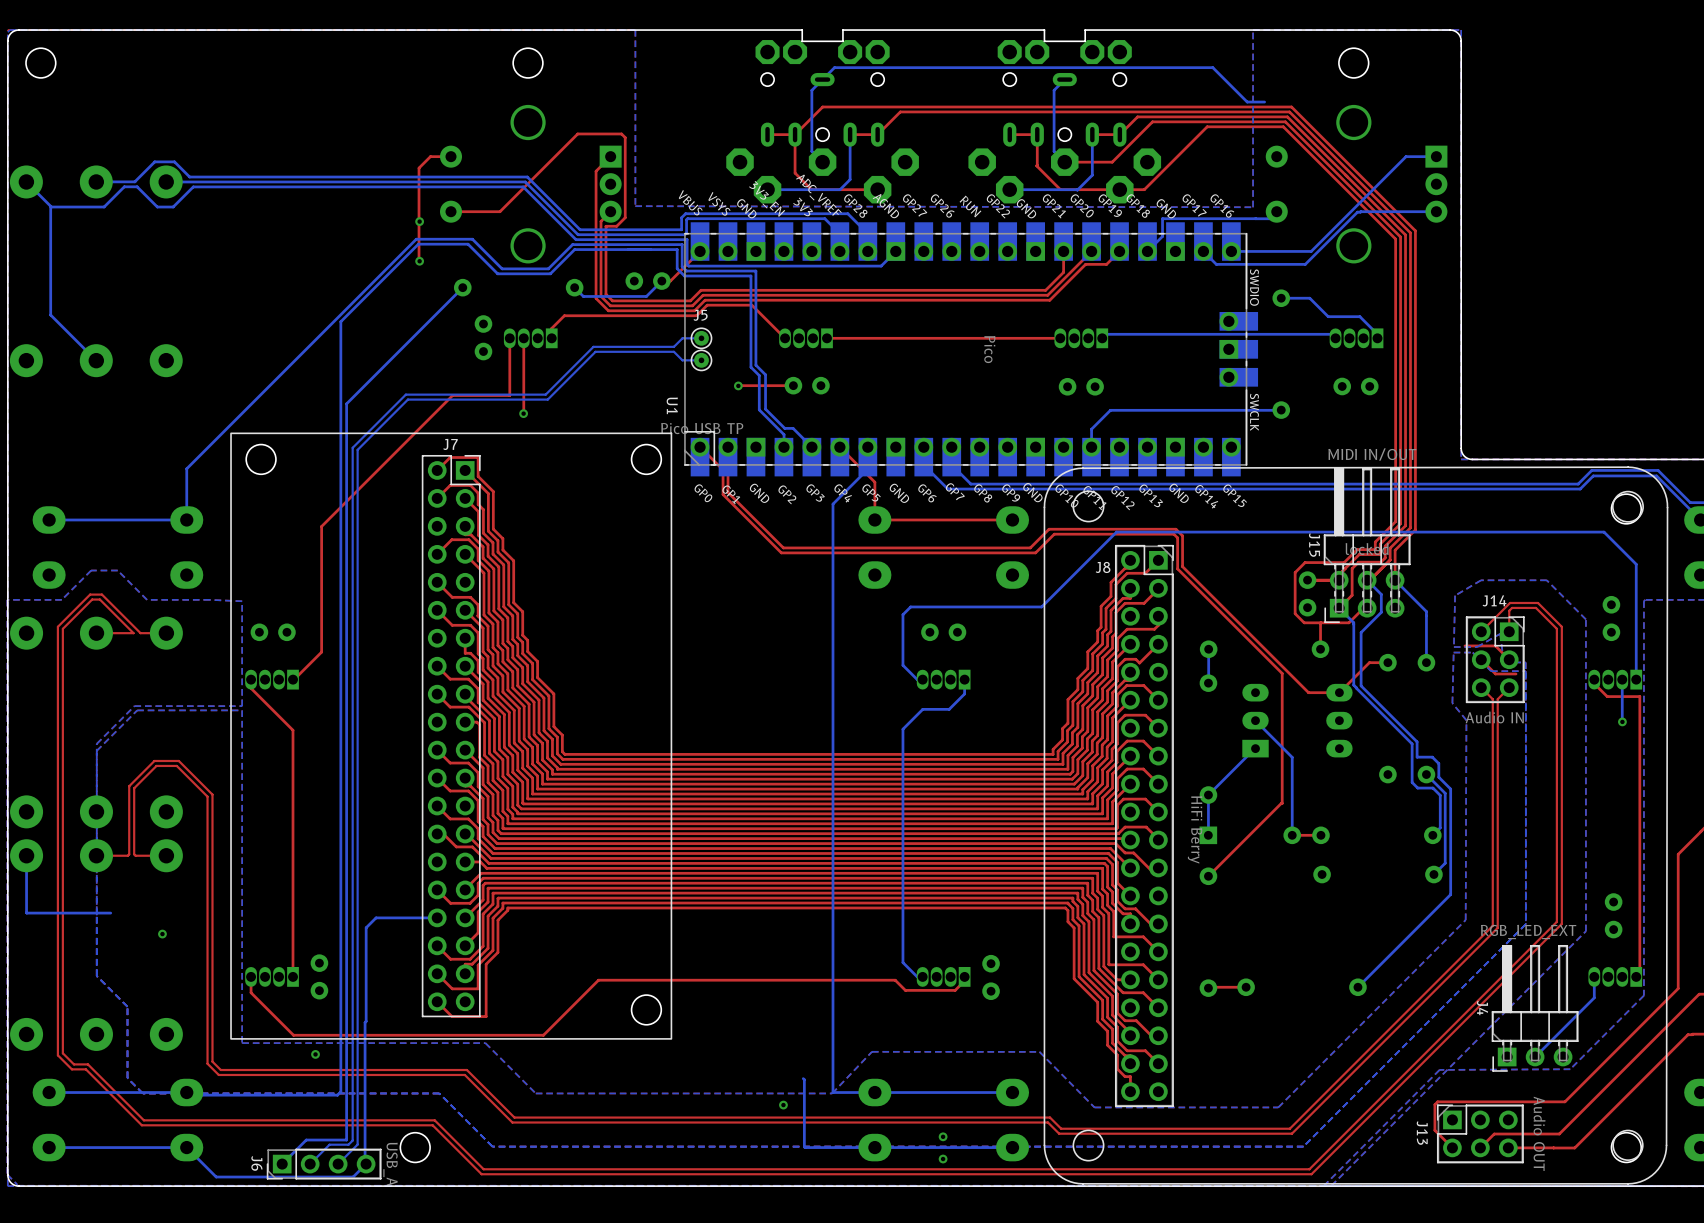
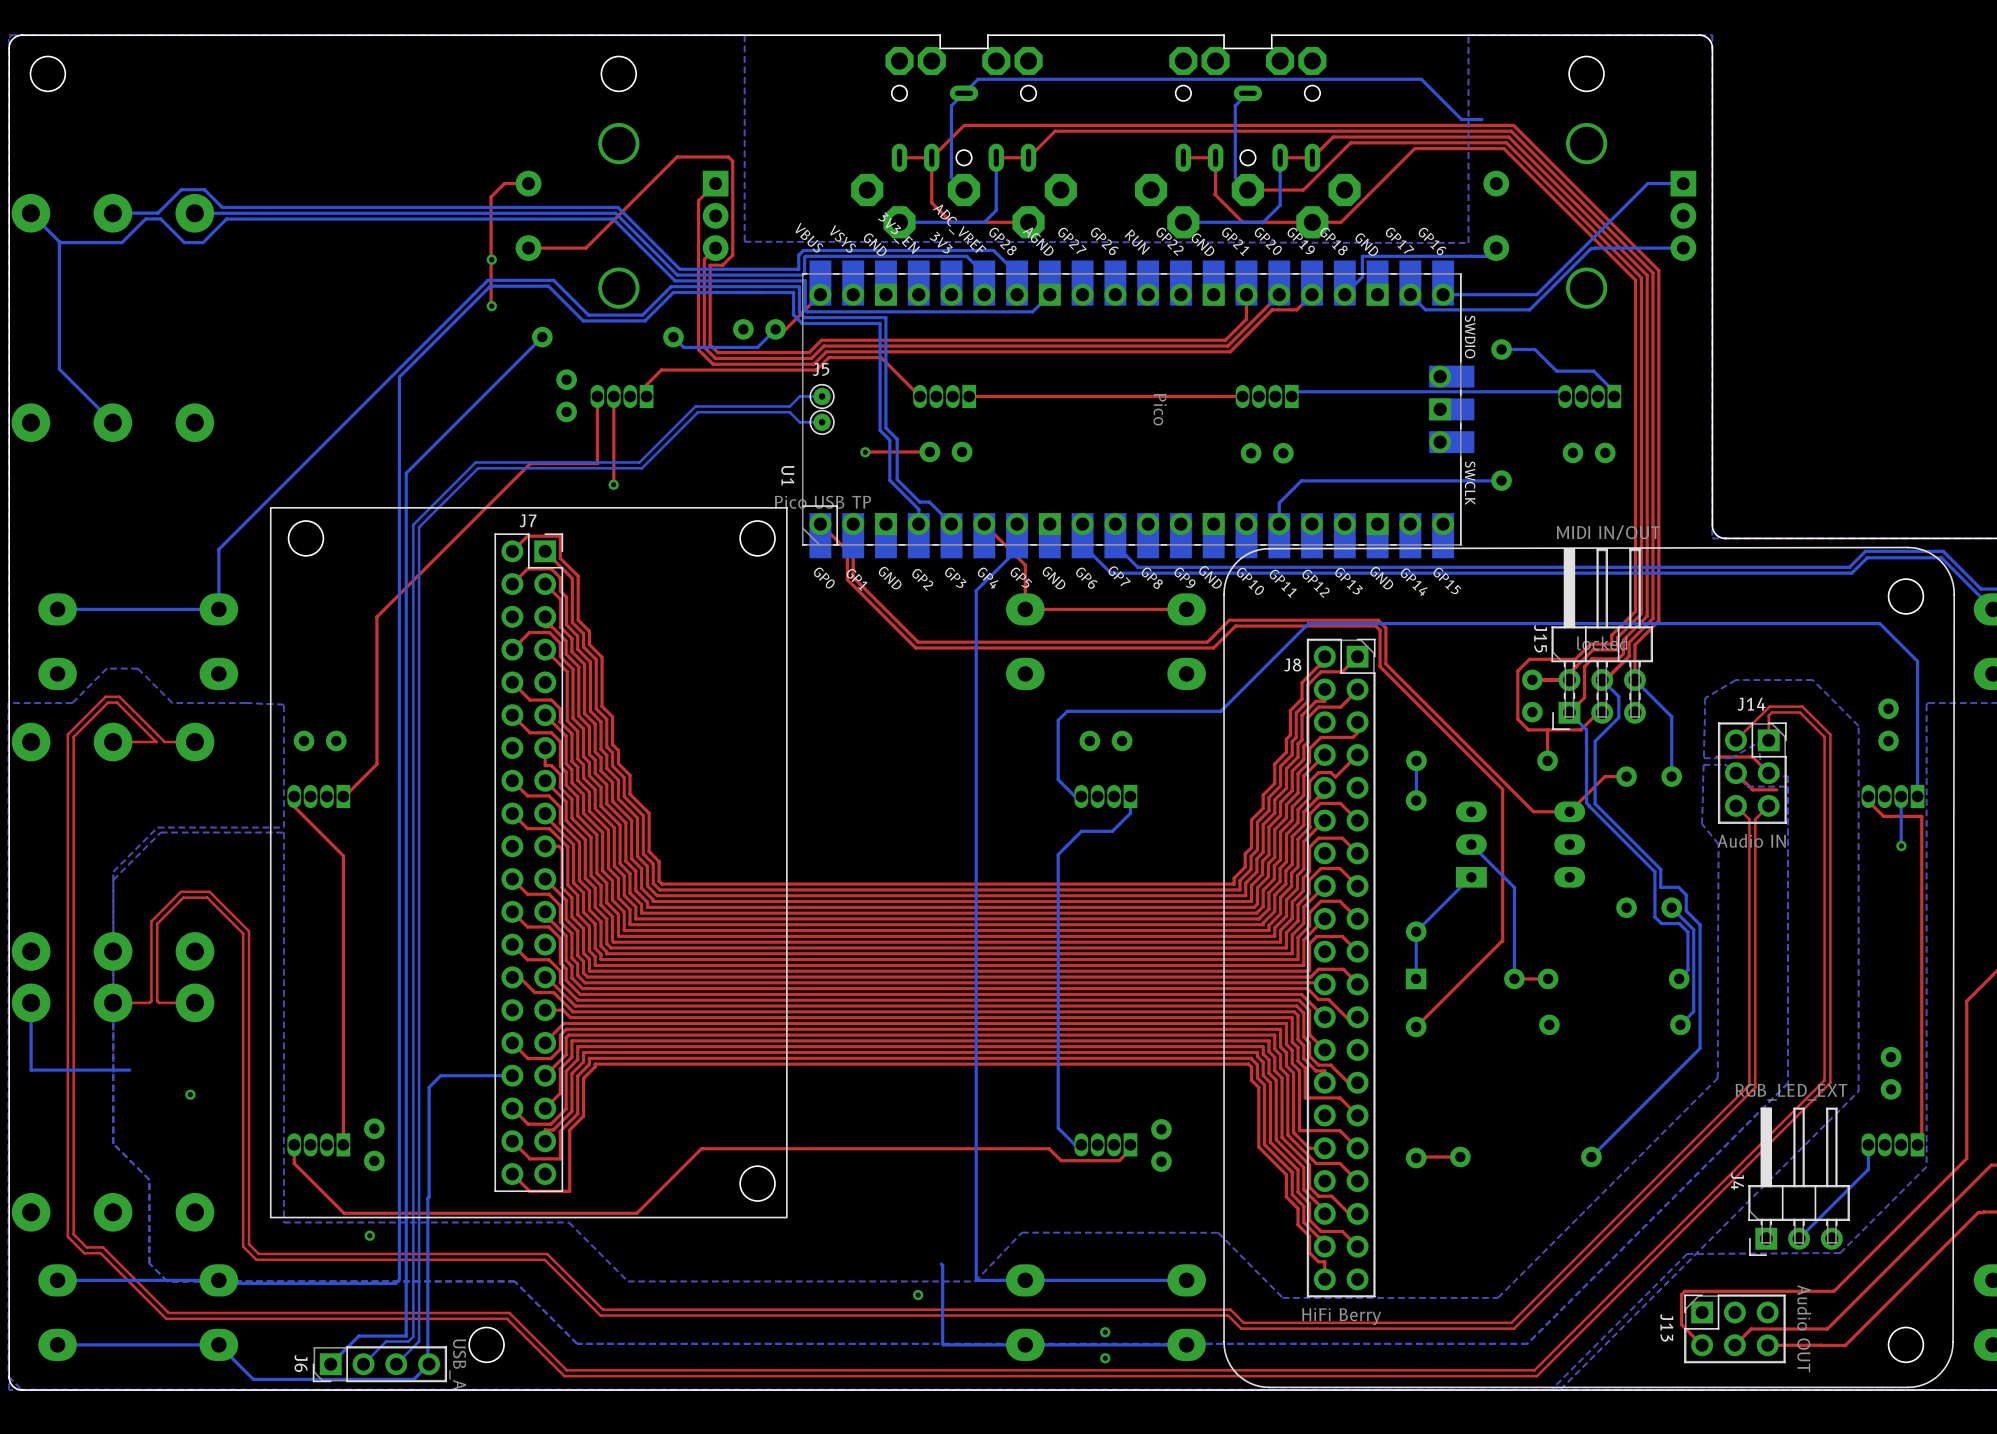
J8 footprint: [1043, 466, 1669, 1185] -> [1223, 546, 1955, 1389]
J8 value position: HiFi Berry (1195, 829) -> HiFi Berry (1341, 1316)

